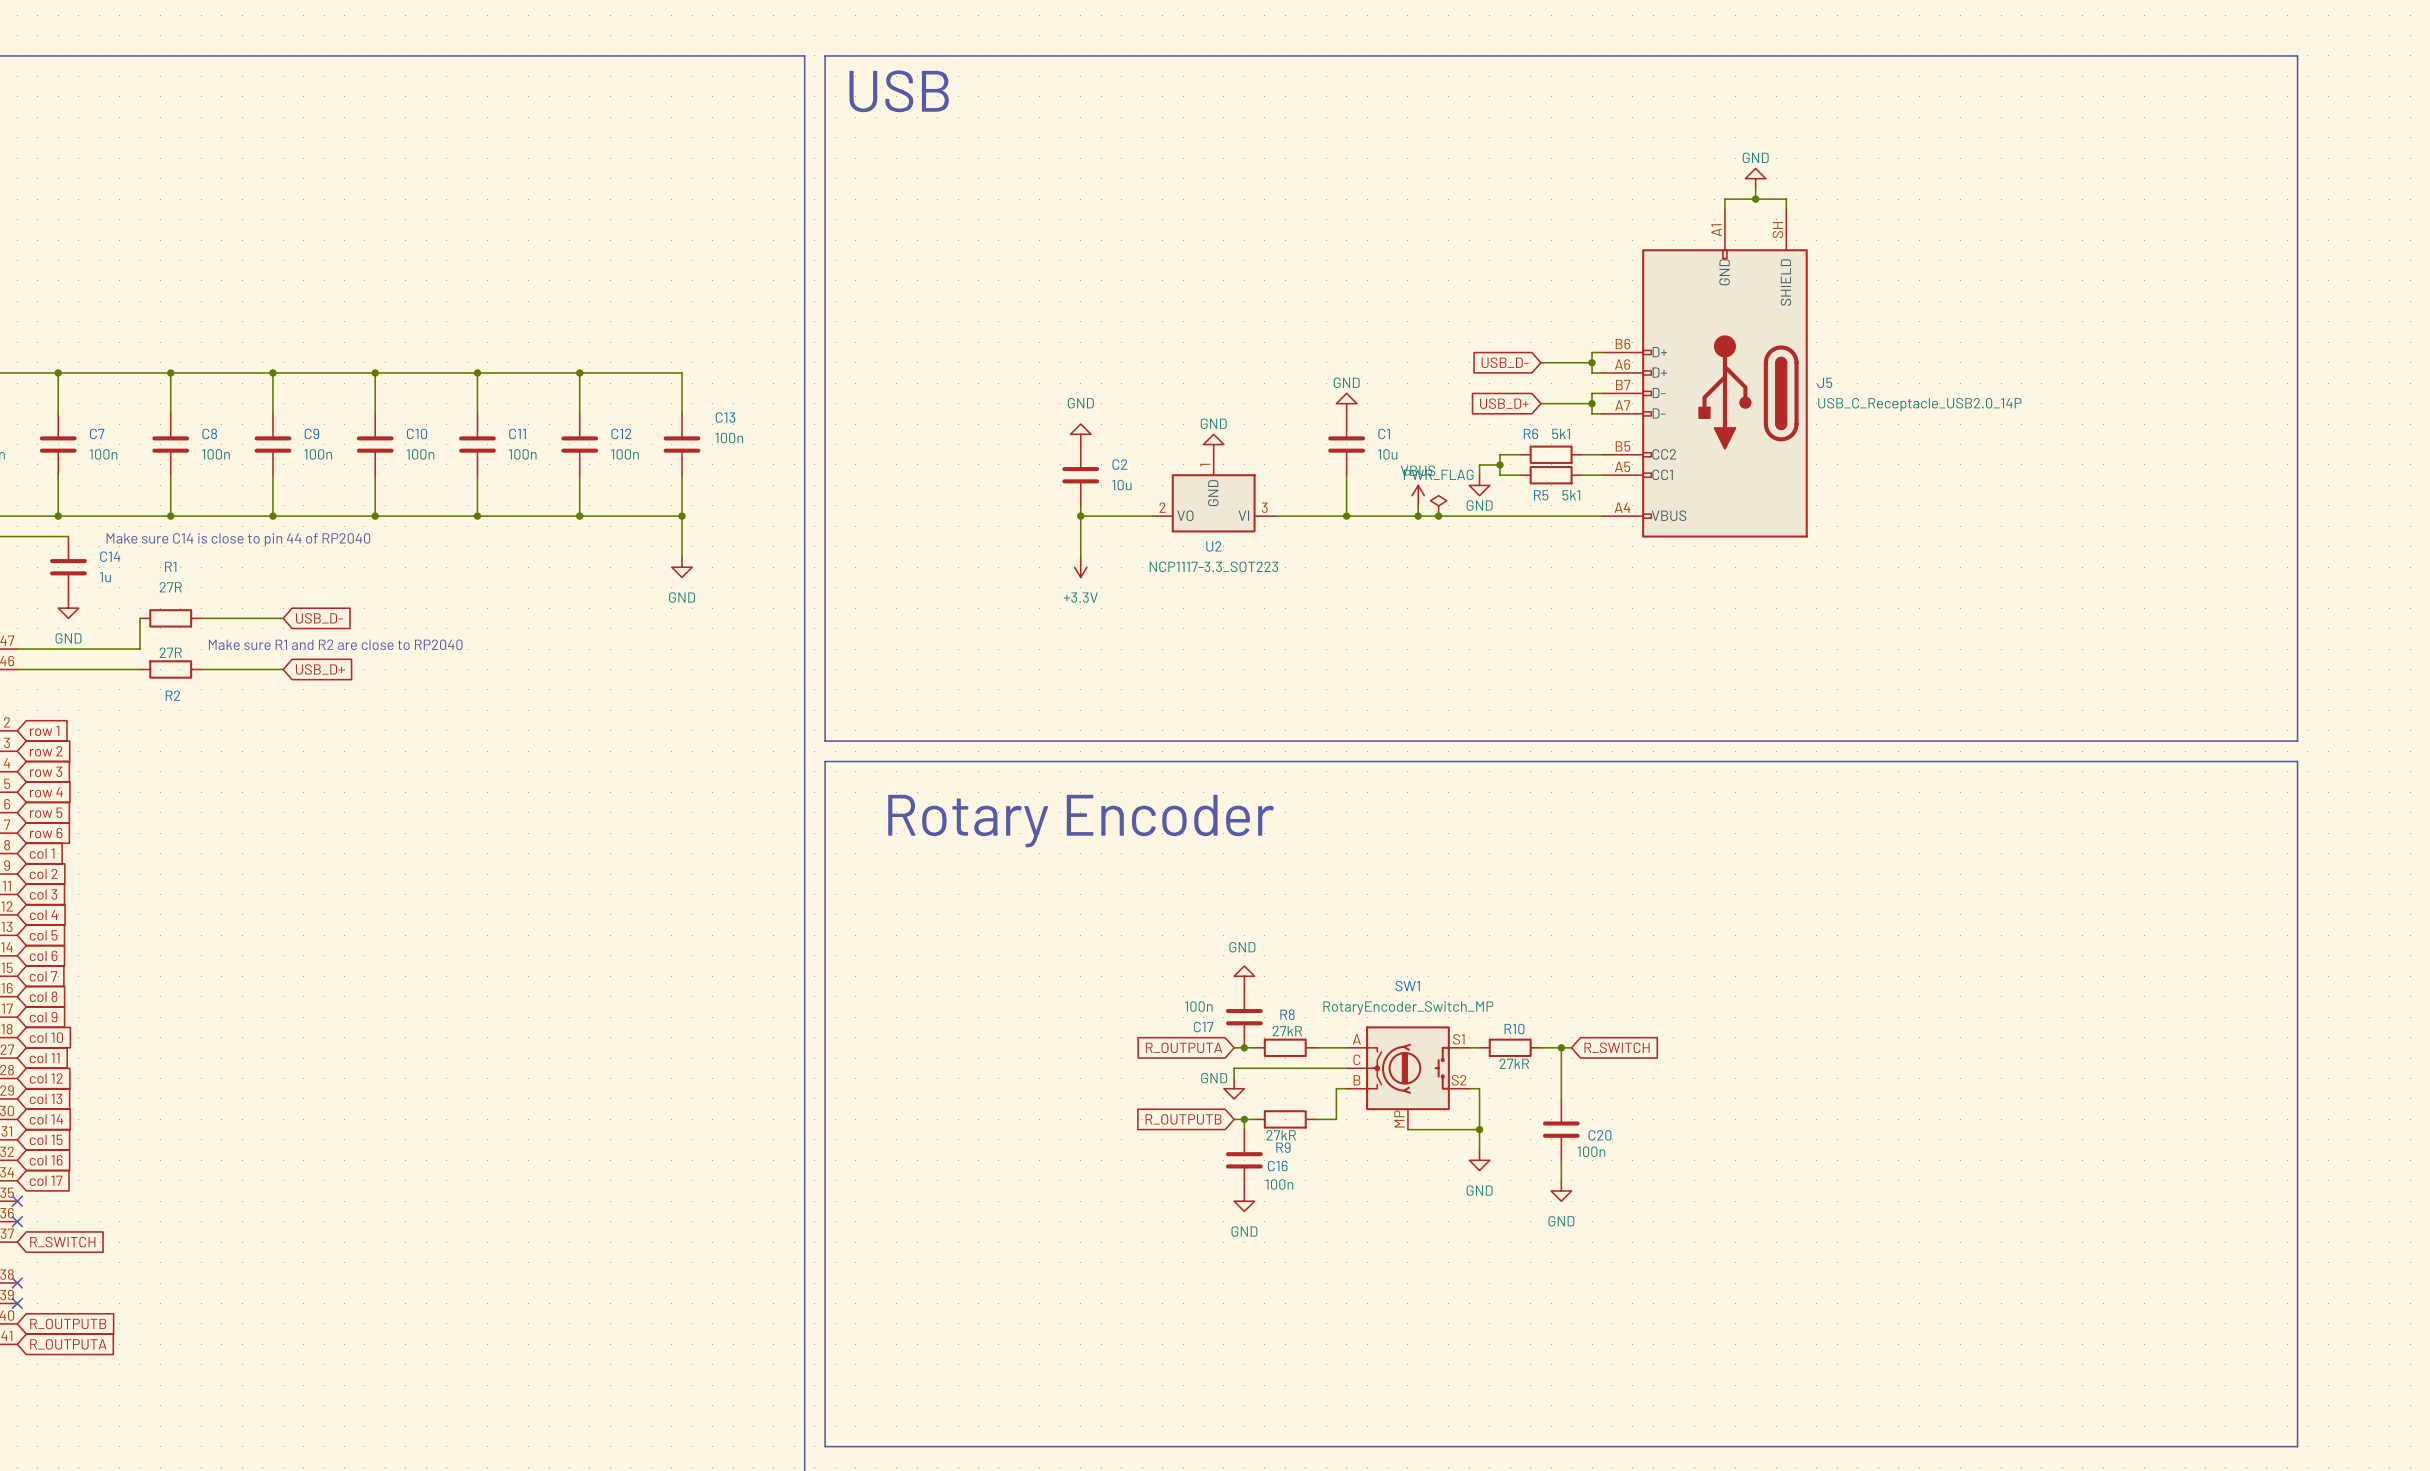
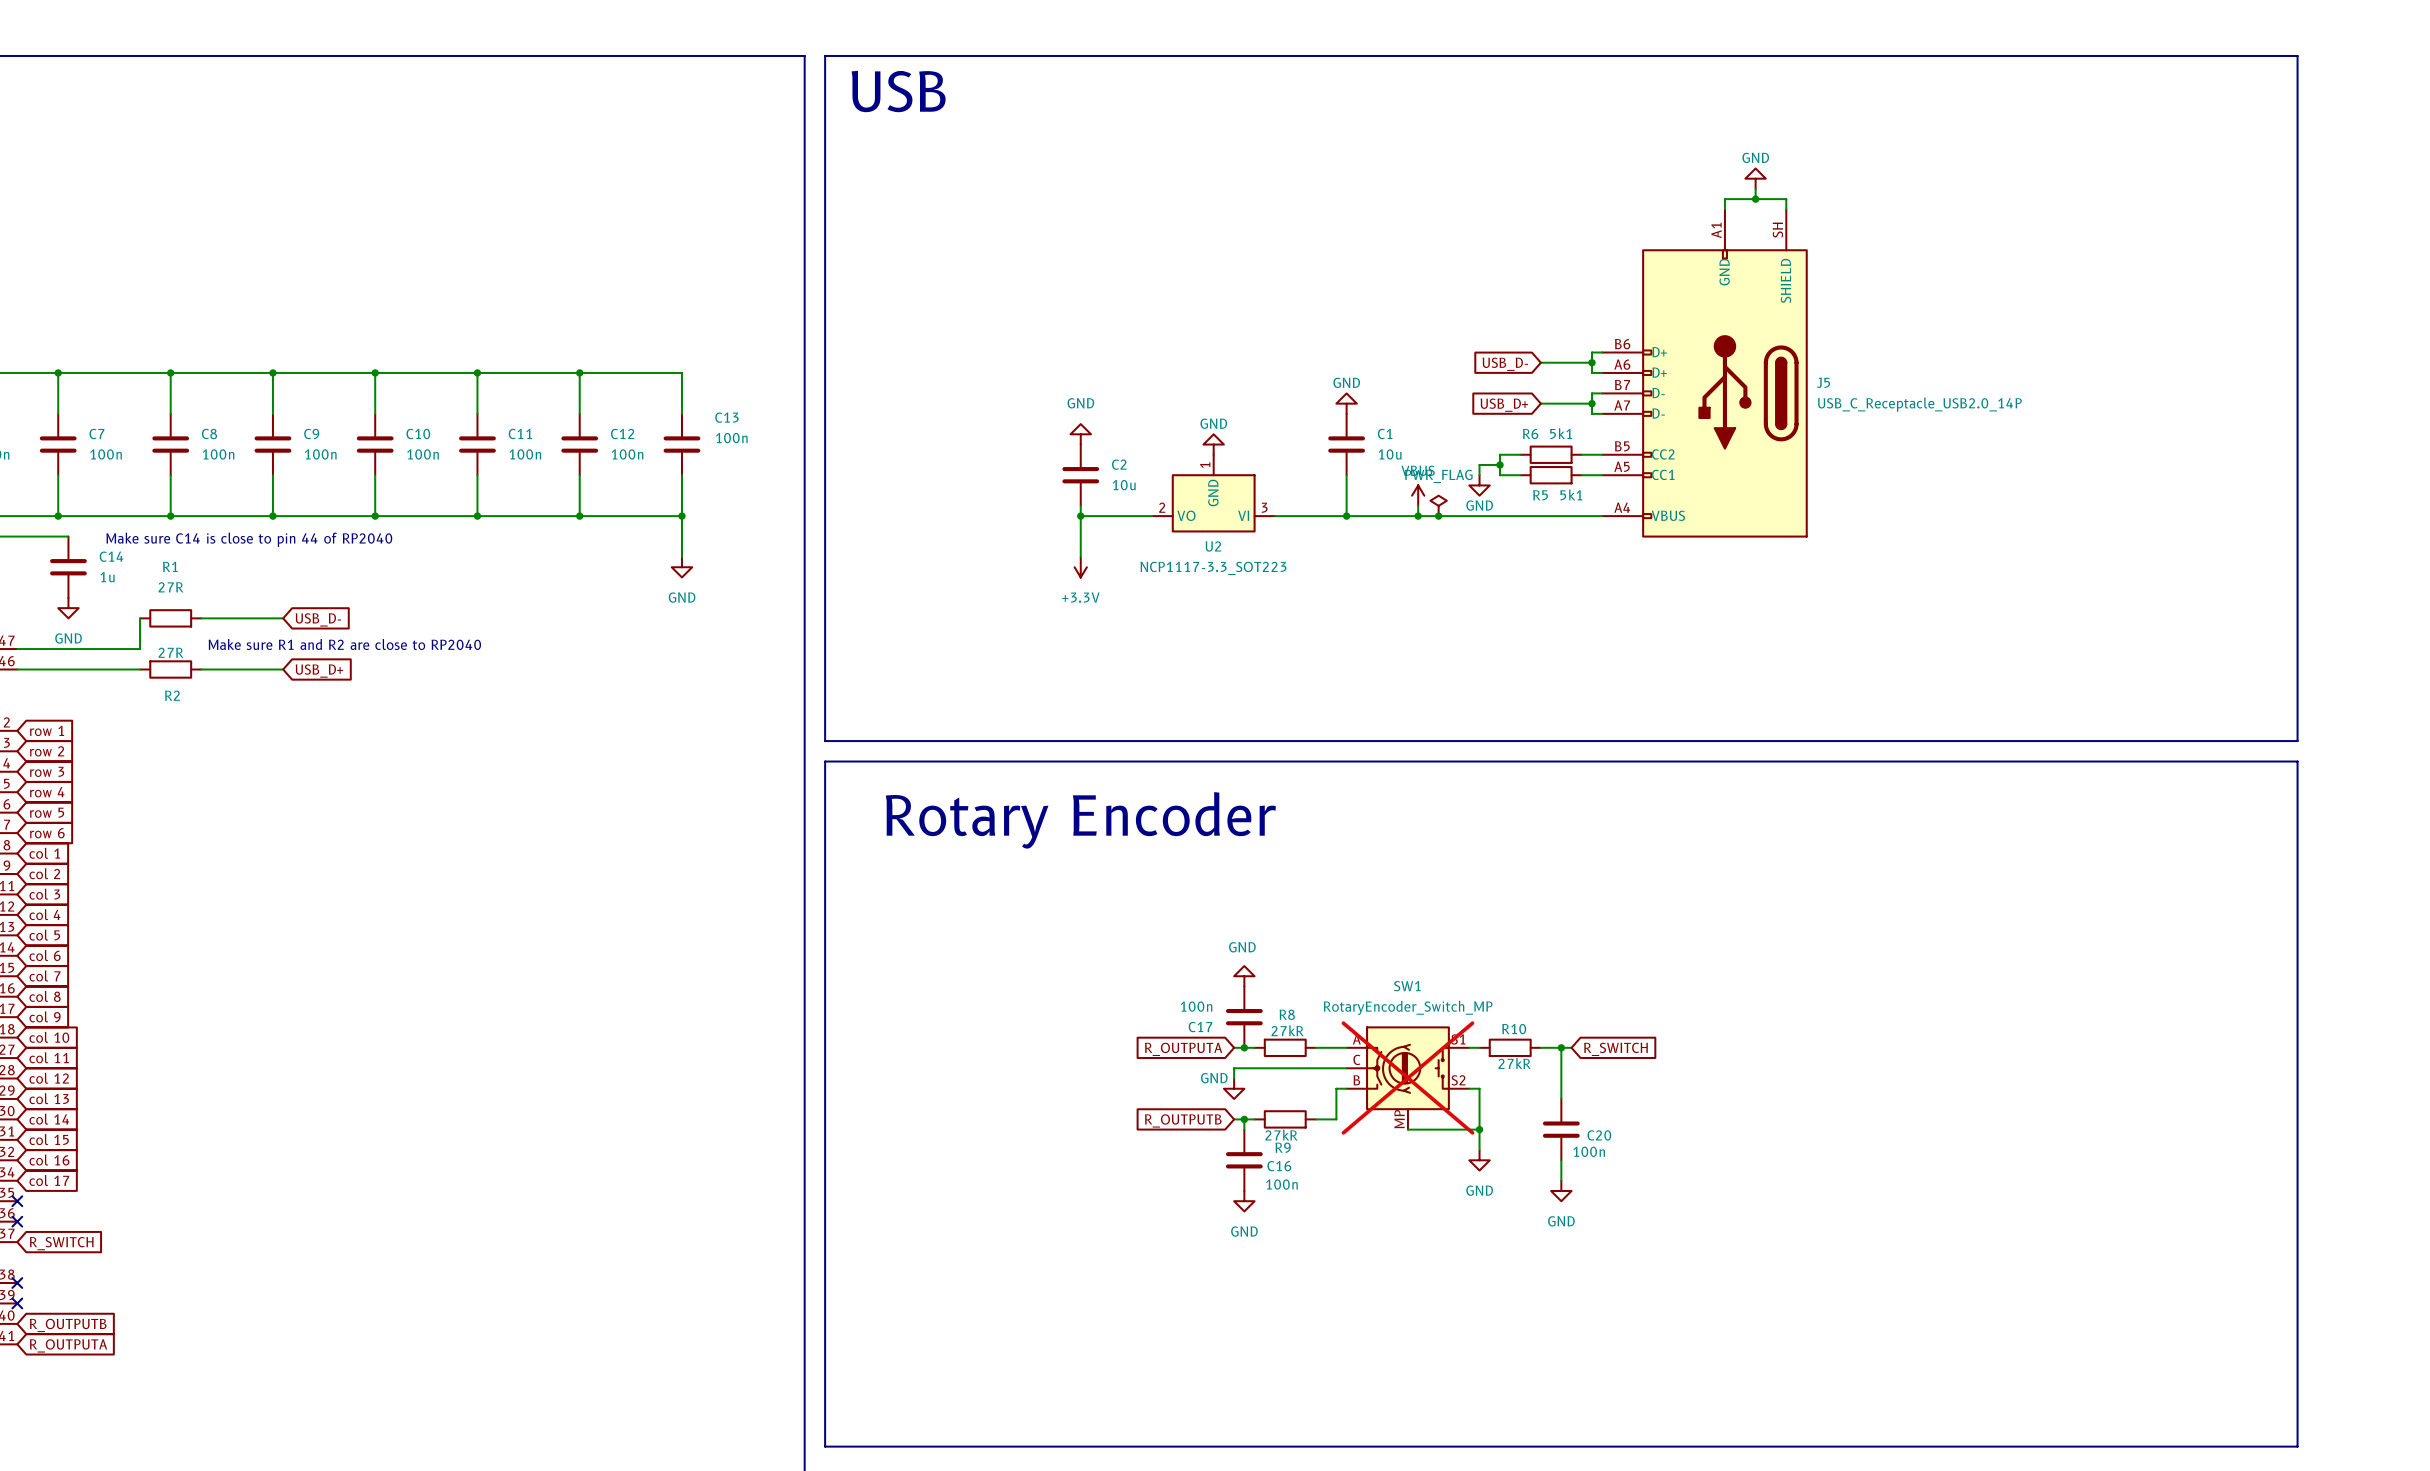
SW1 do-not-place cross: none -> (1407, 1077)

